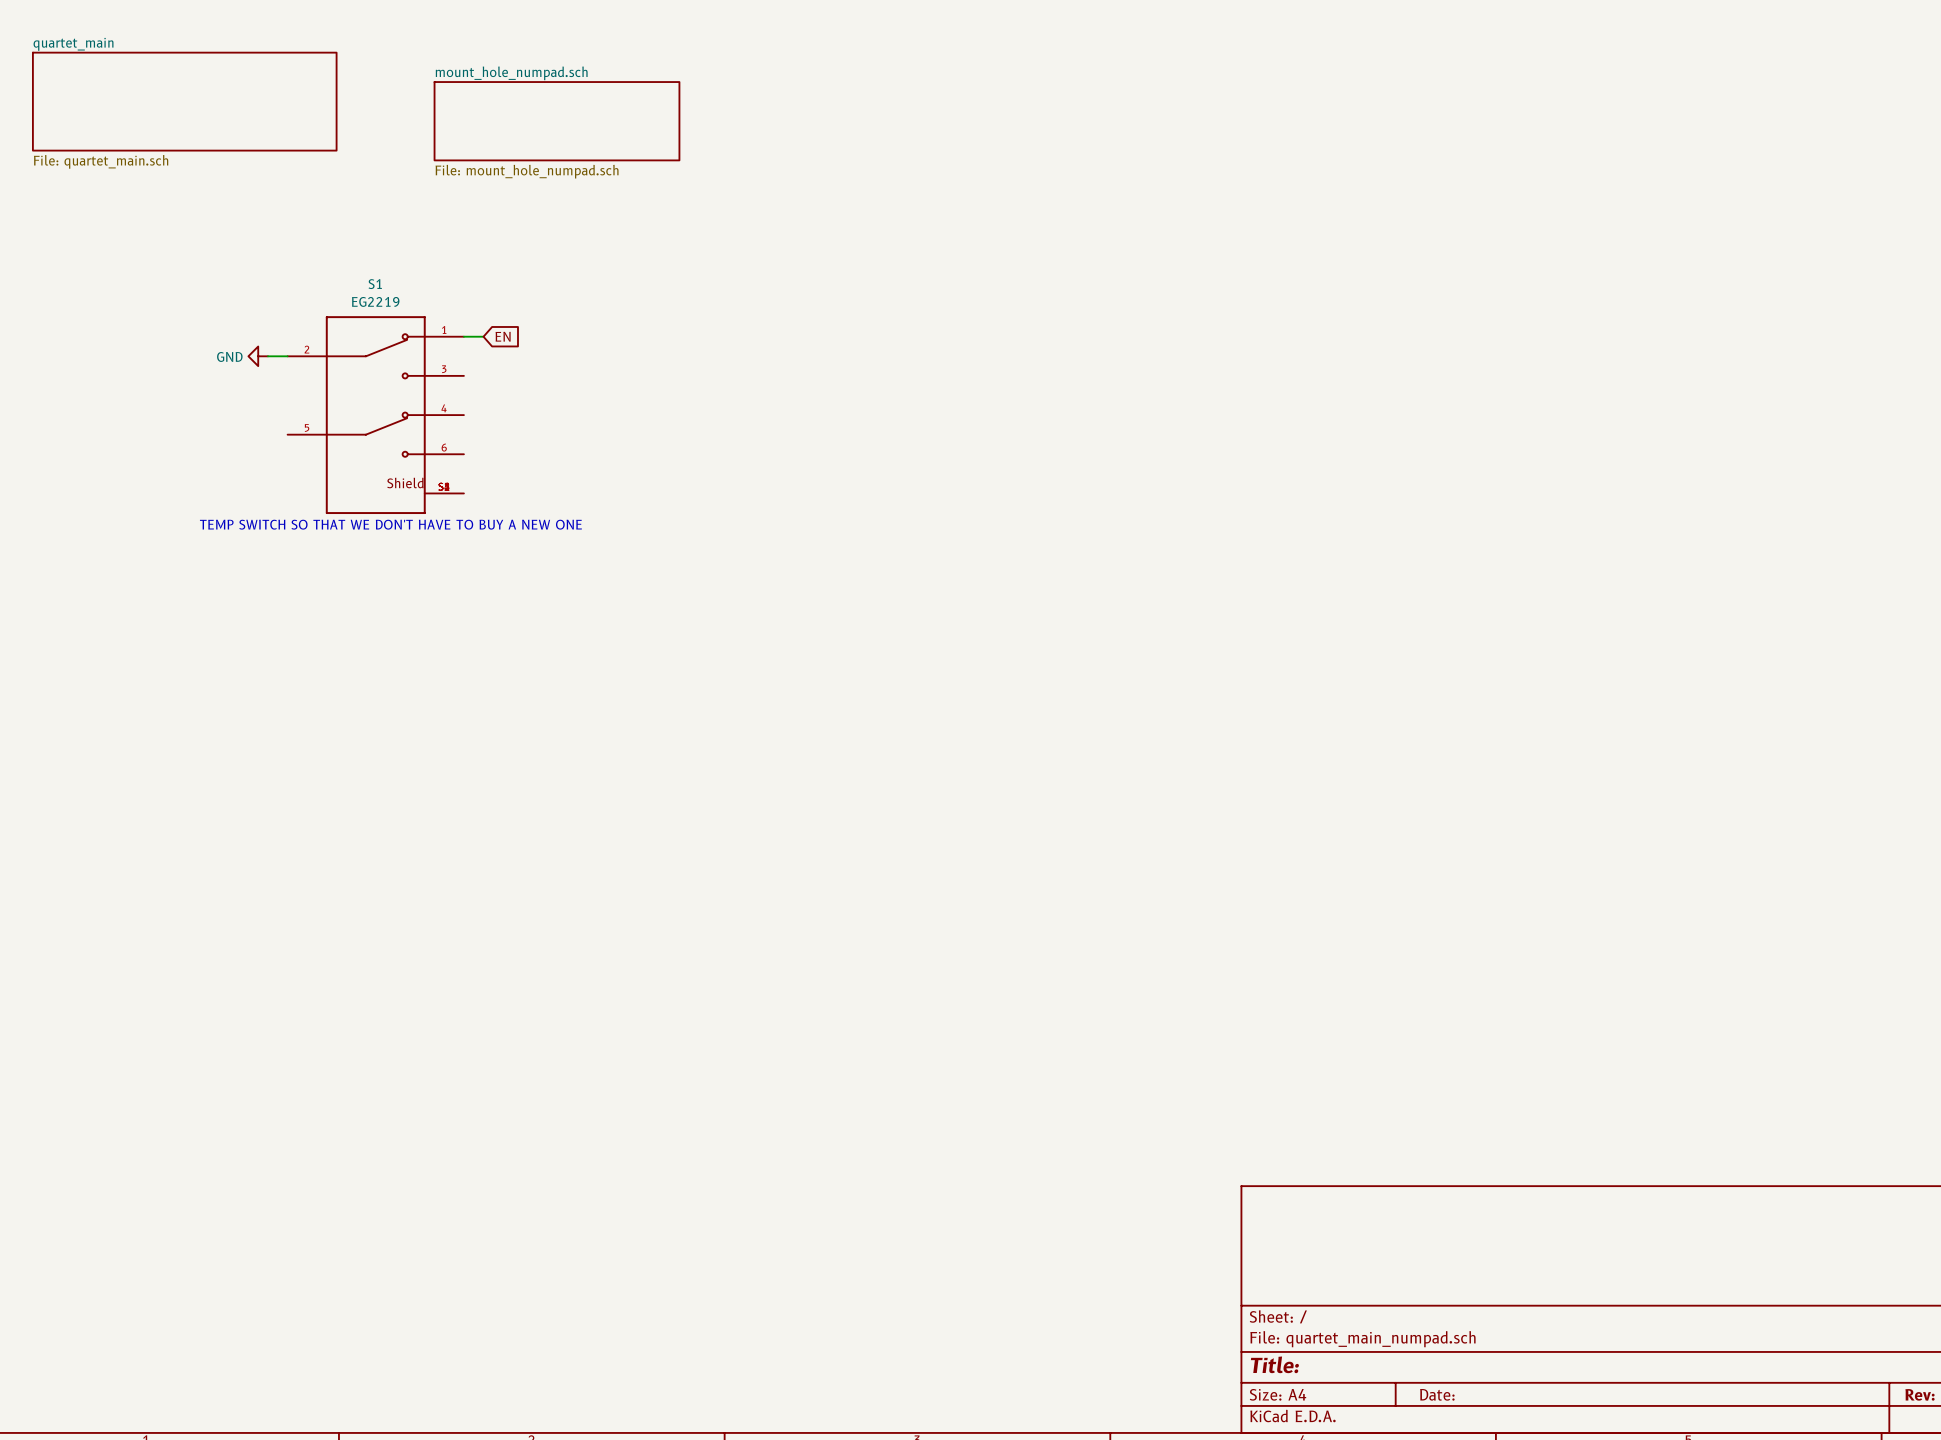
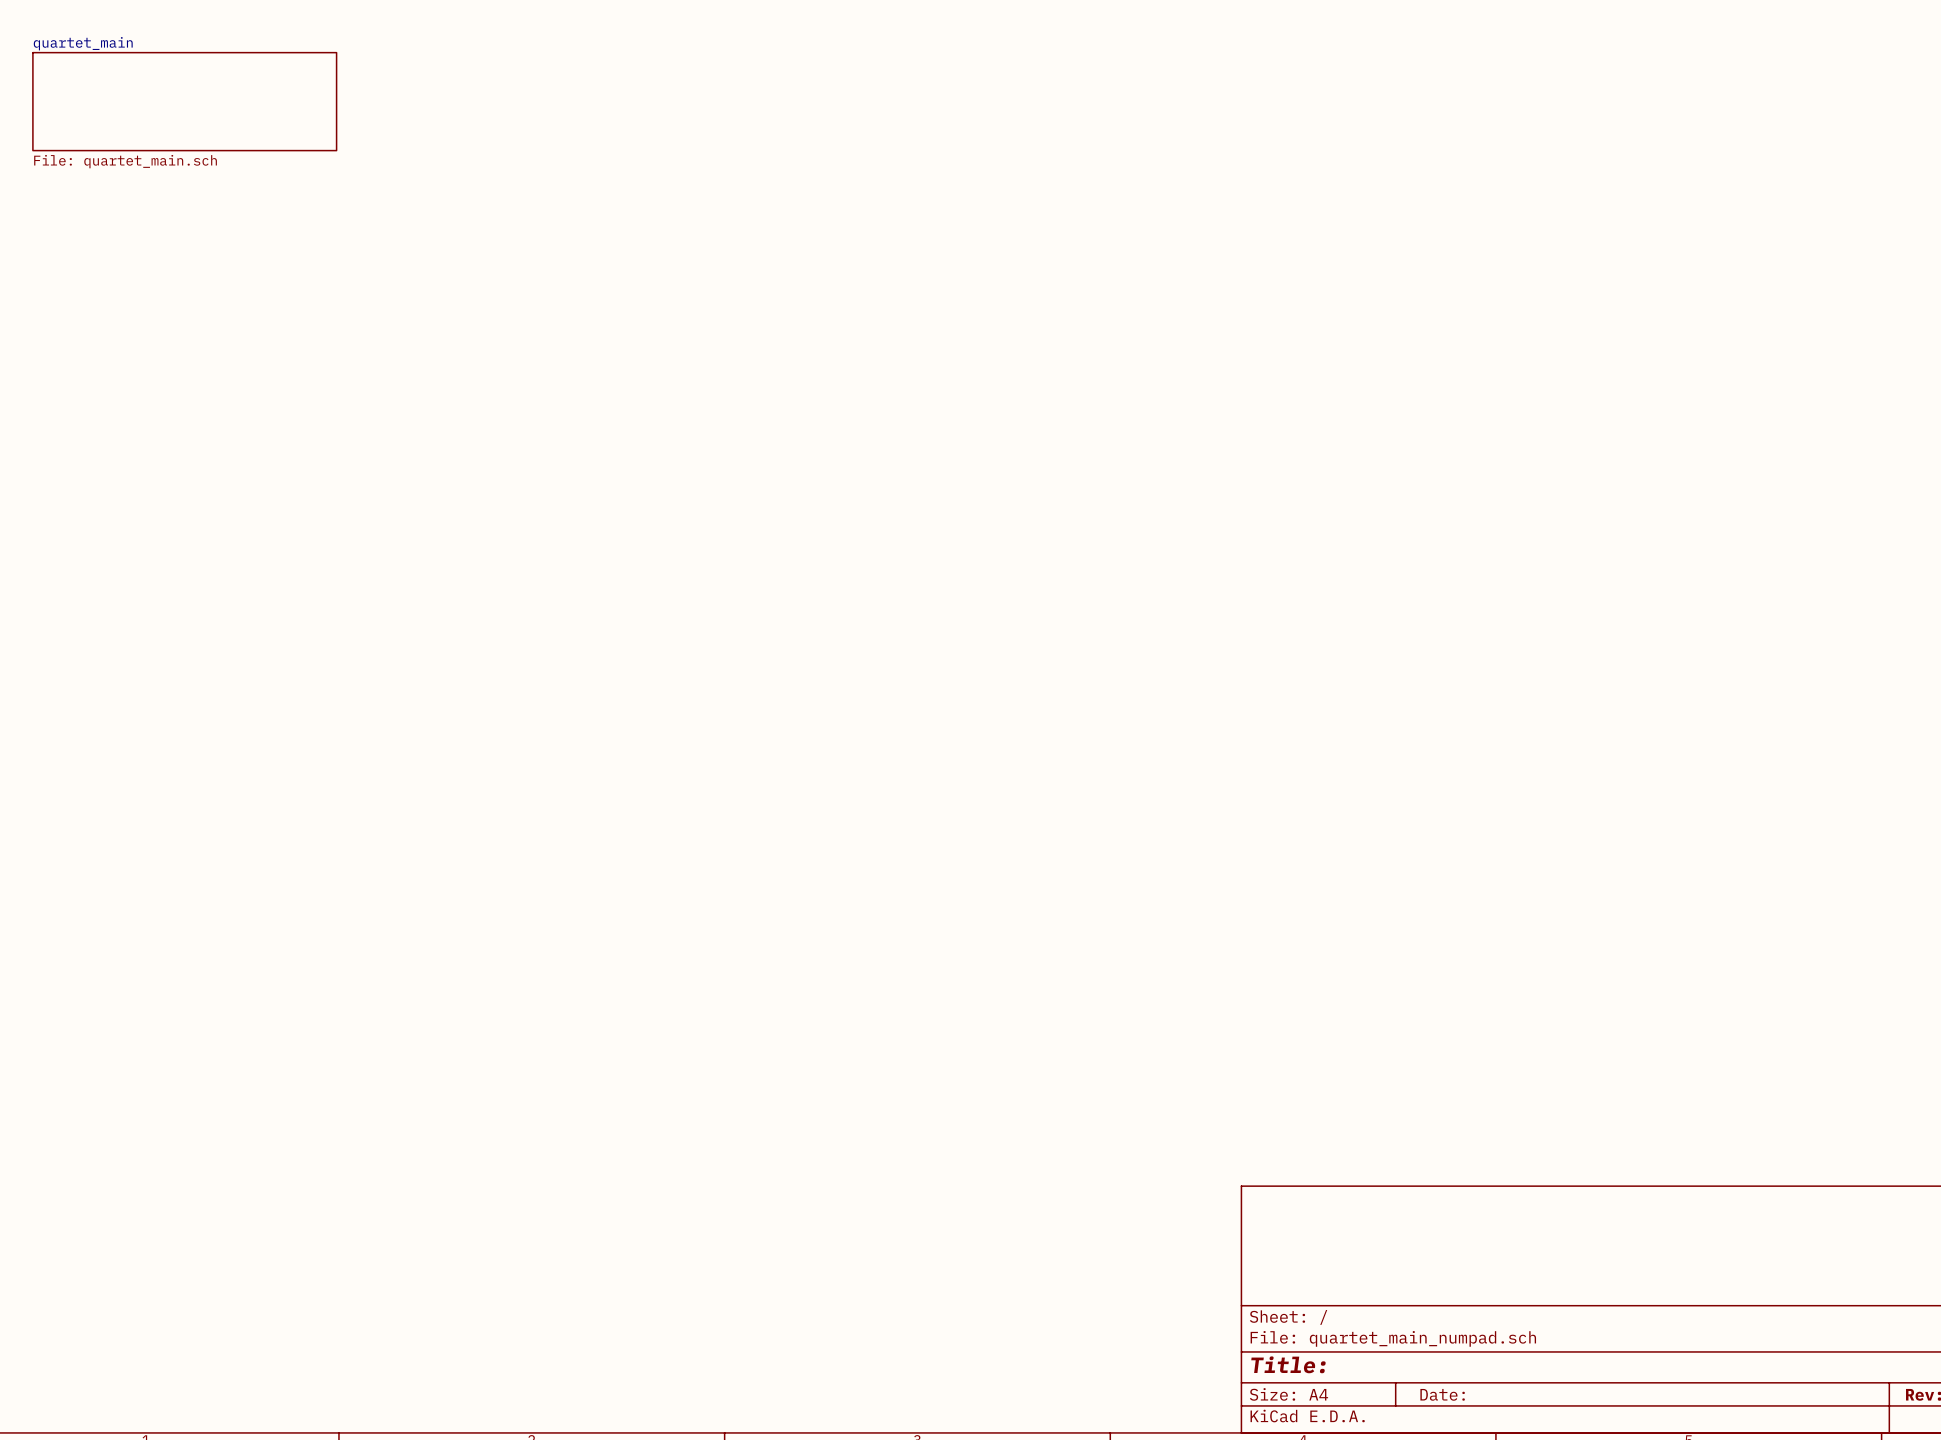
sheet mount_hole_numpad.sch: File: mount_hole_numpad.sch (556, 121) -> none
wire: (463, 336) (483, 336) -> none
global label: EN (503, 336) -> none
power symbol: GND (258, 356) -> none
wire: (268, 356) (287, 356) -> none
S1: EG2219 (375, 415) -> none
text: TEMP SWITCH SO THAT WE DON'T HAVE TO BUY A NEW ONE (390, 524) -> none

